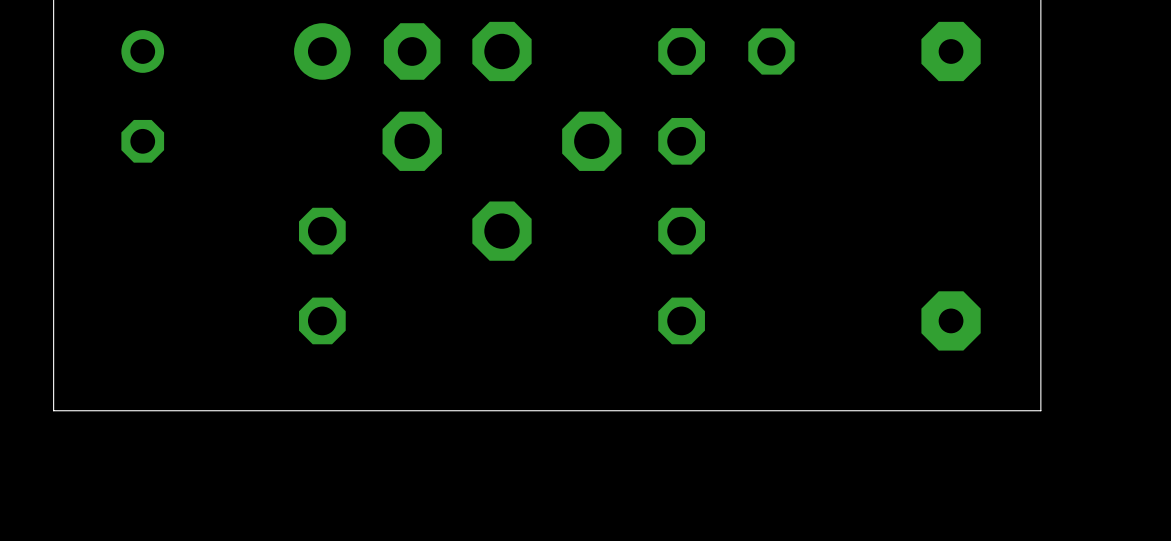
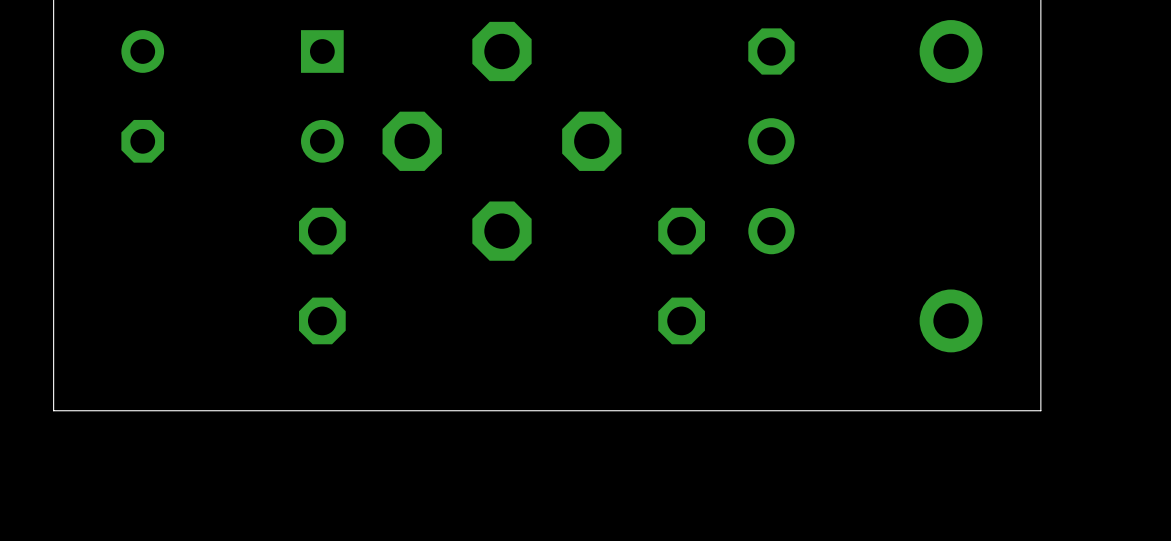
part footprint: [921, 21, 981, 82] -> [919, 20, 983, 83]
part: (367, 51) -> none
part: none -> (322, 96)
part: (681, 96) -> none
part: none -> (771, 186)
part footprint: [921, 291, 981, 351] -> [919, 289, 983, 353]

